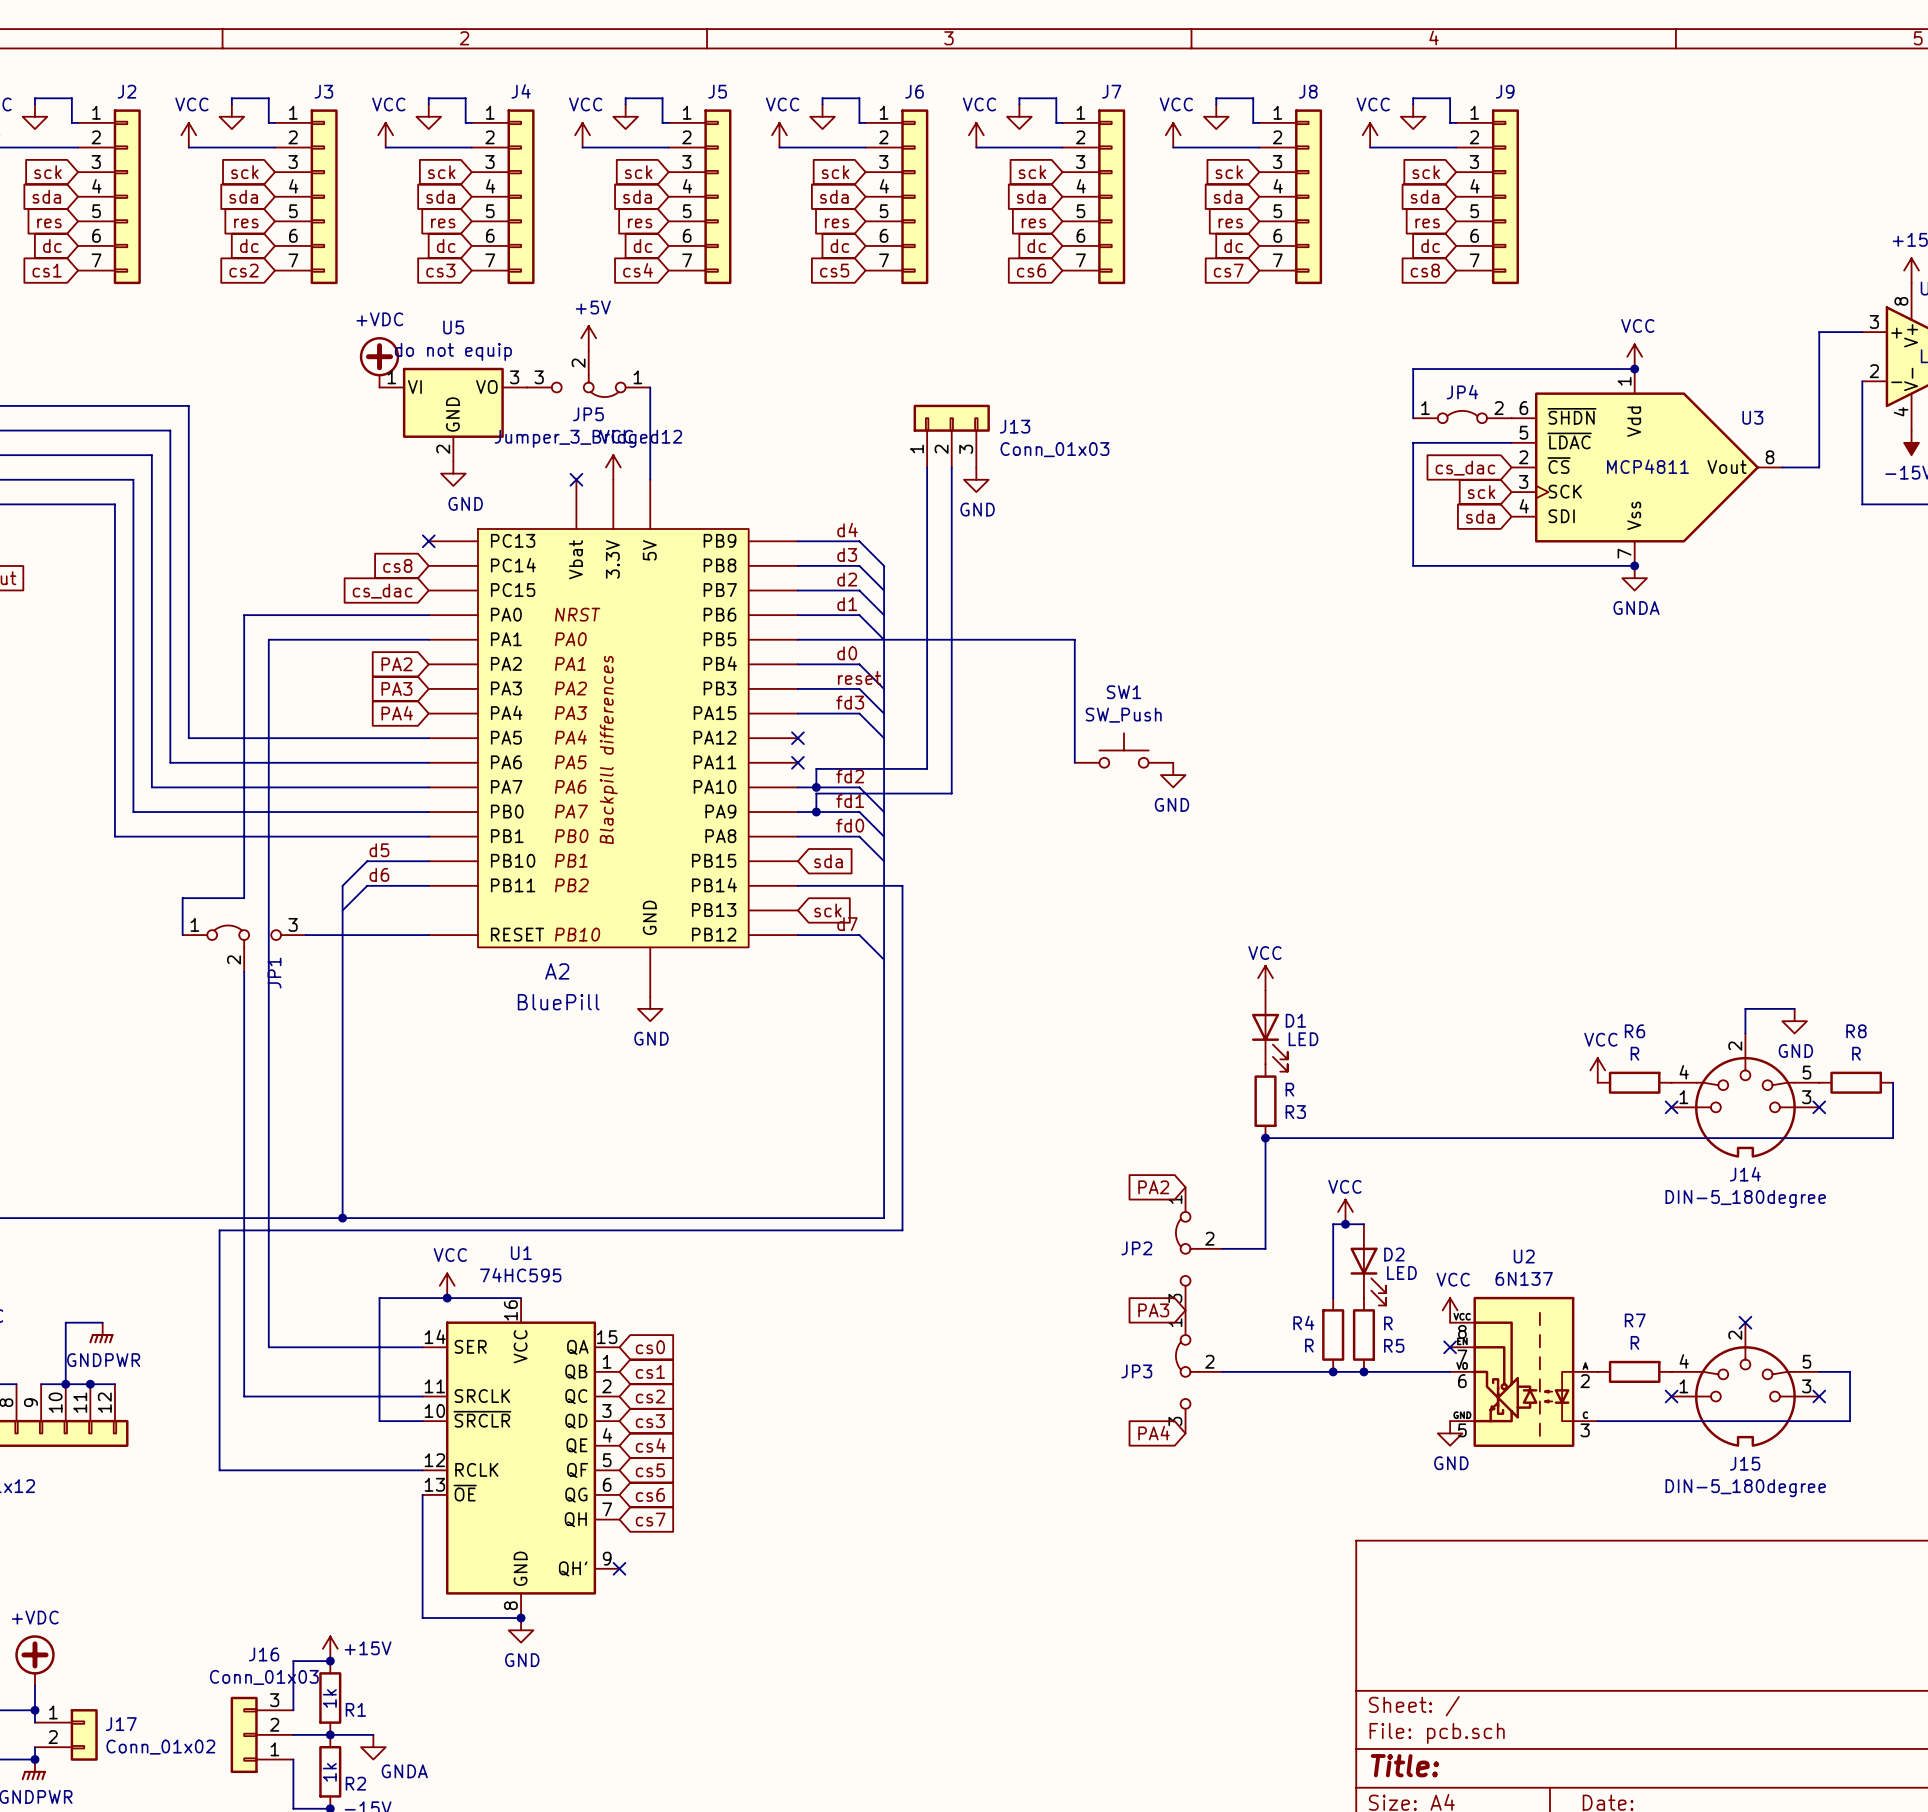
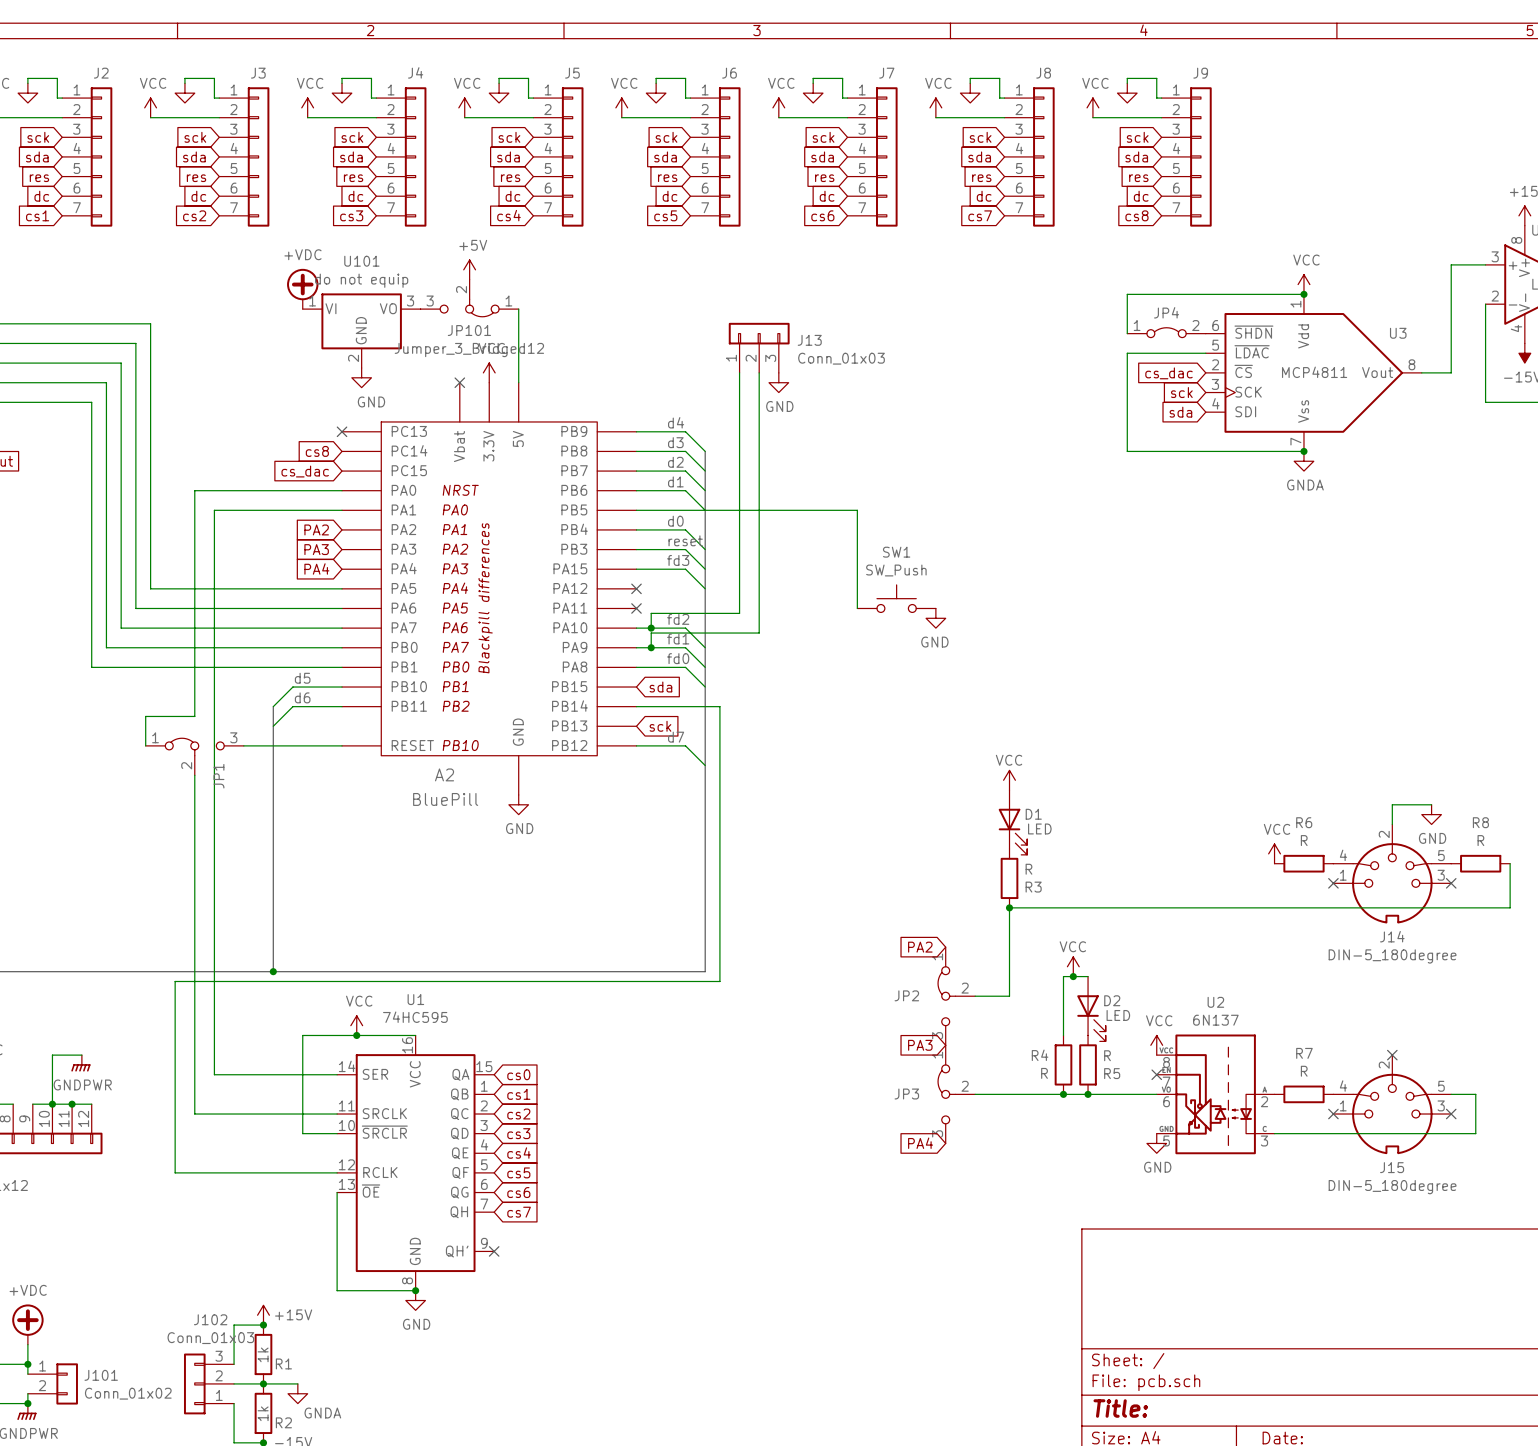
U5 name: U5 (453, 327) -> U101 (361, 261)
JP5 name: JP5 (588, 414) -> JP101 (469, 330)
J16 name: J16 (264, 1654) -> J102 (210, 1319)
J17 name: J17 (121, 1724) -> J101 (101, 1375)

